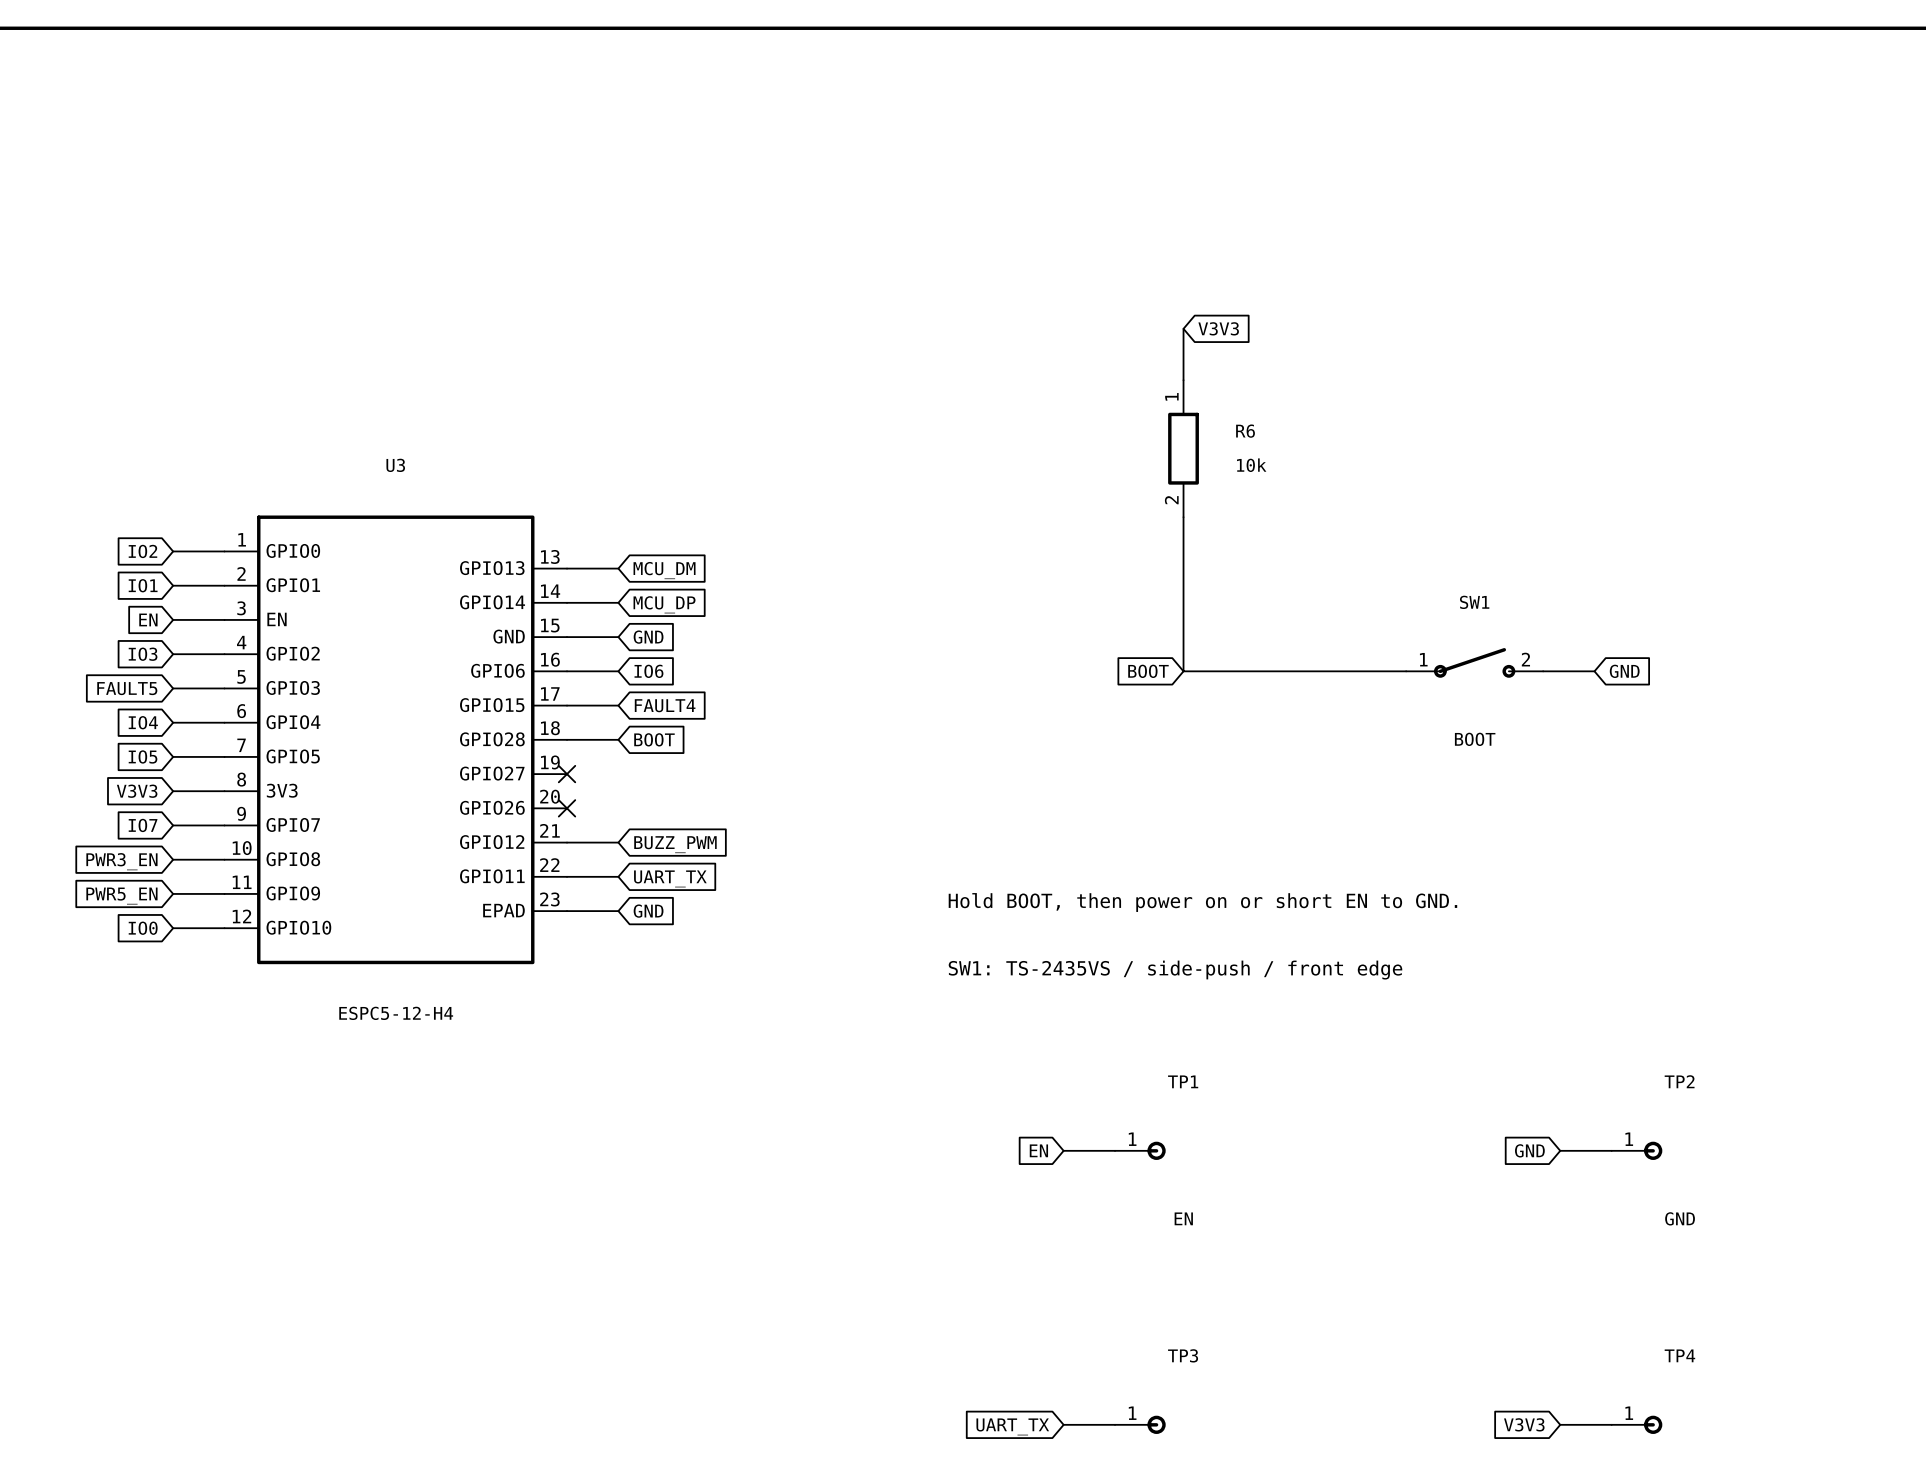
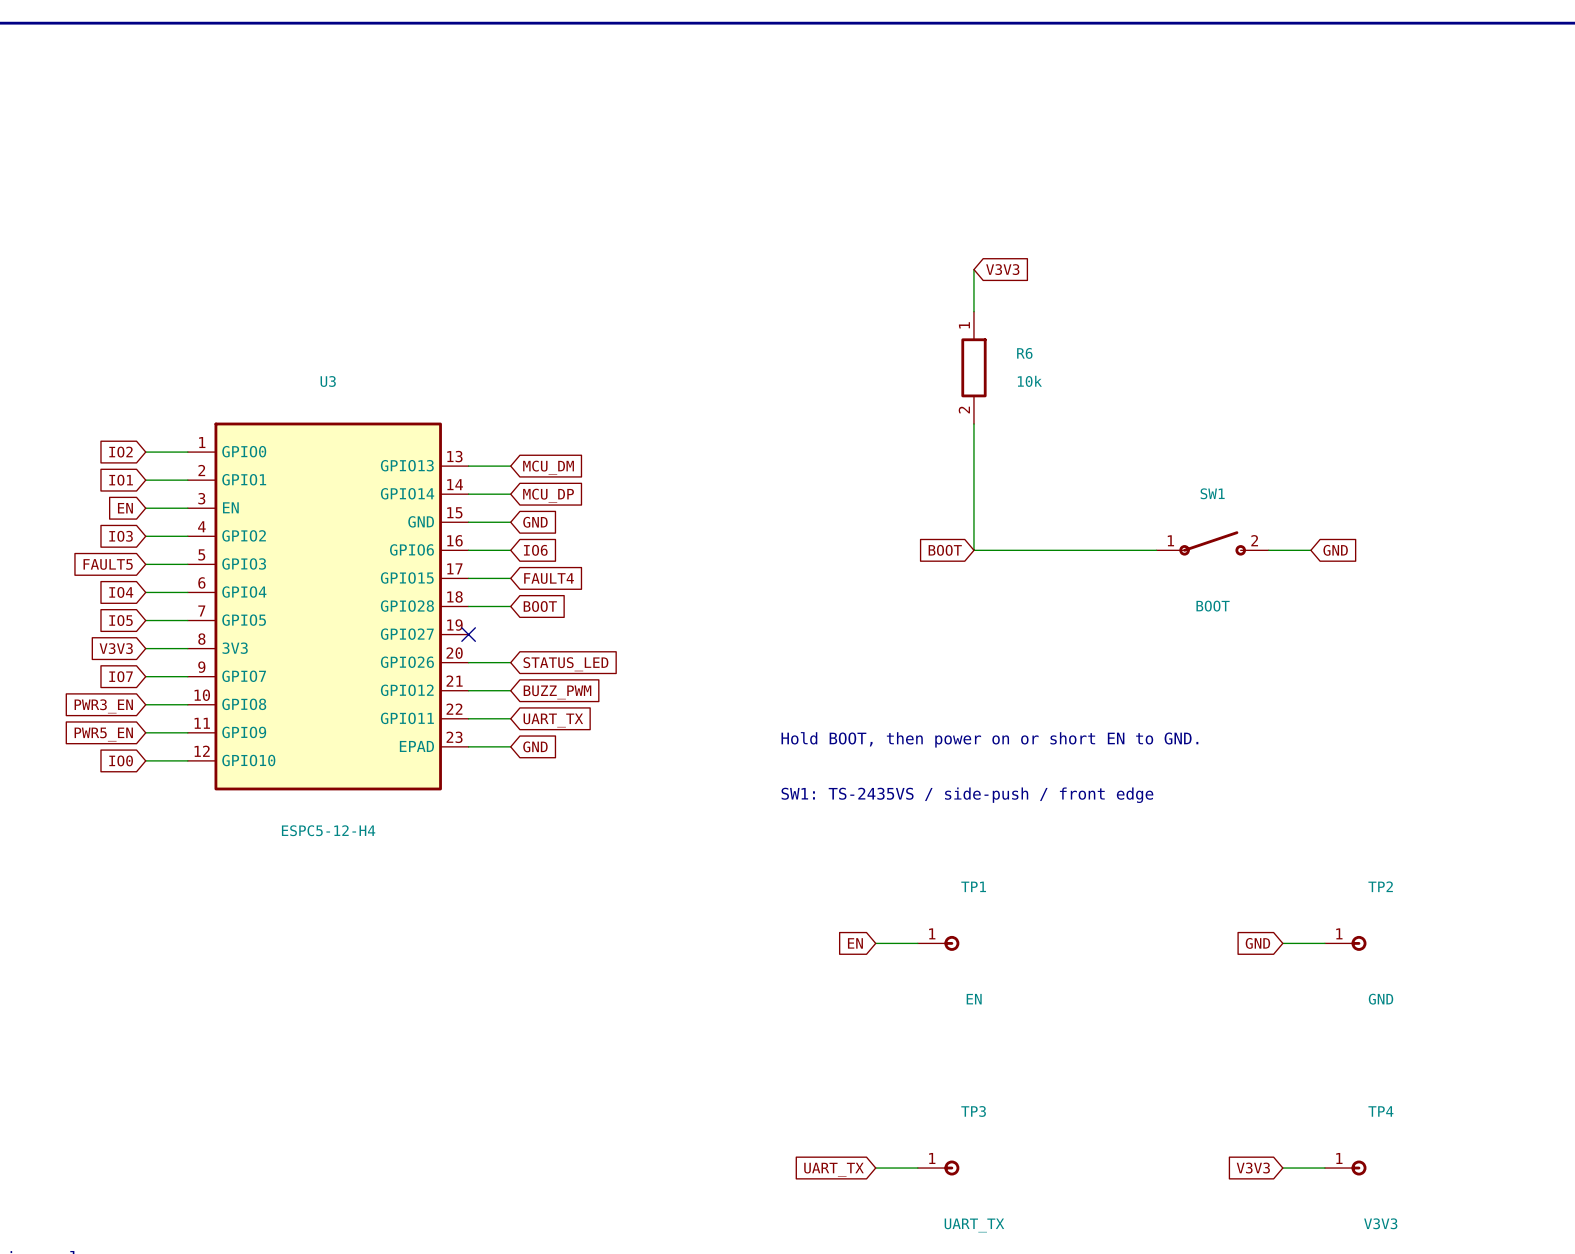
wire: none -> (468, 662) (510, 662)
no-connect mark: (567, 808) -> none
global label: none -> STATUS_LED (565, 664)

